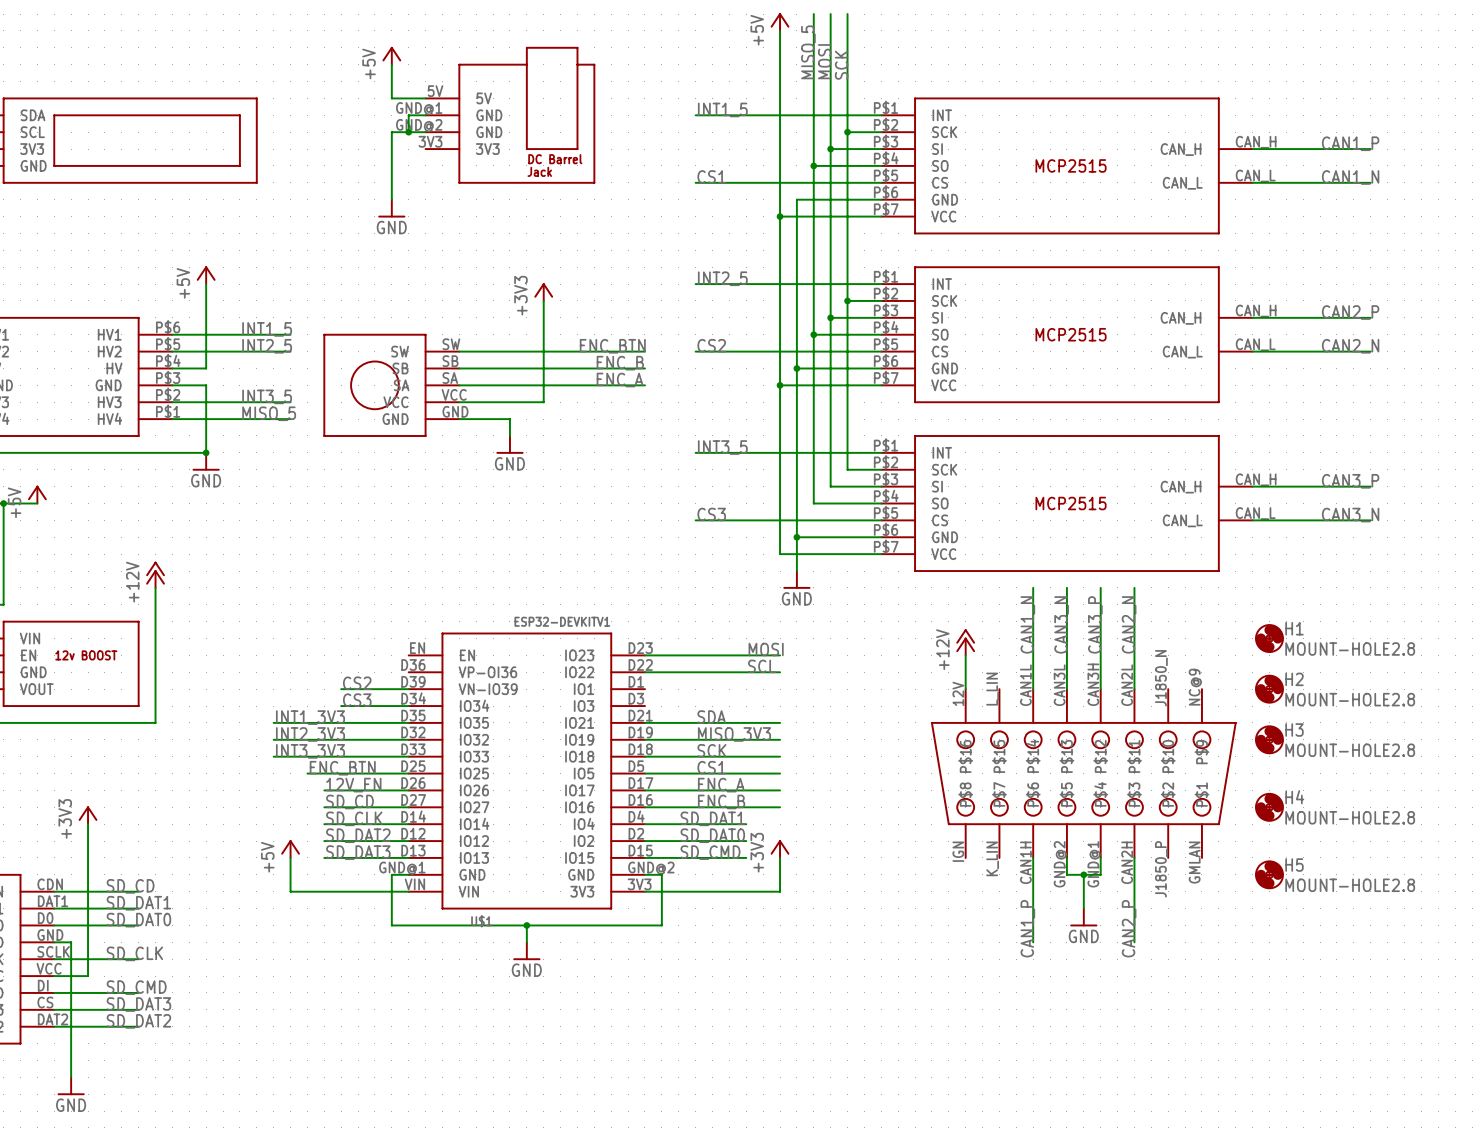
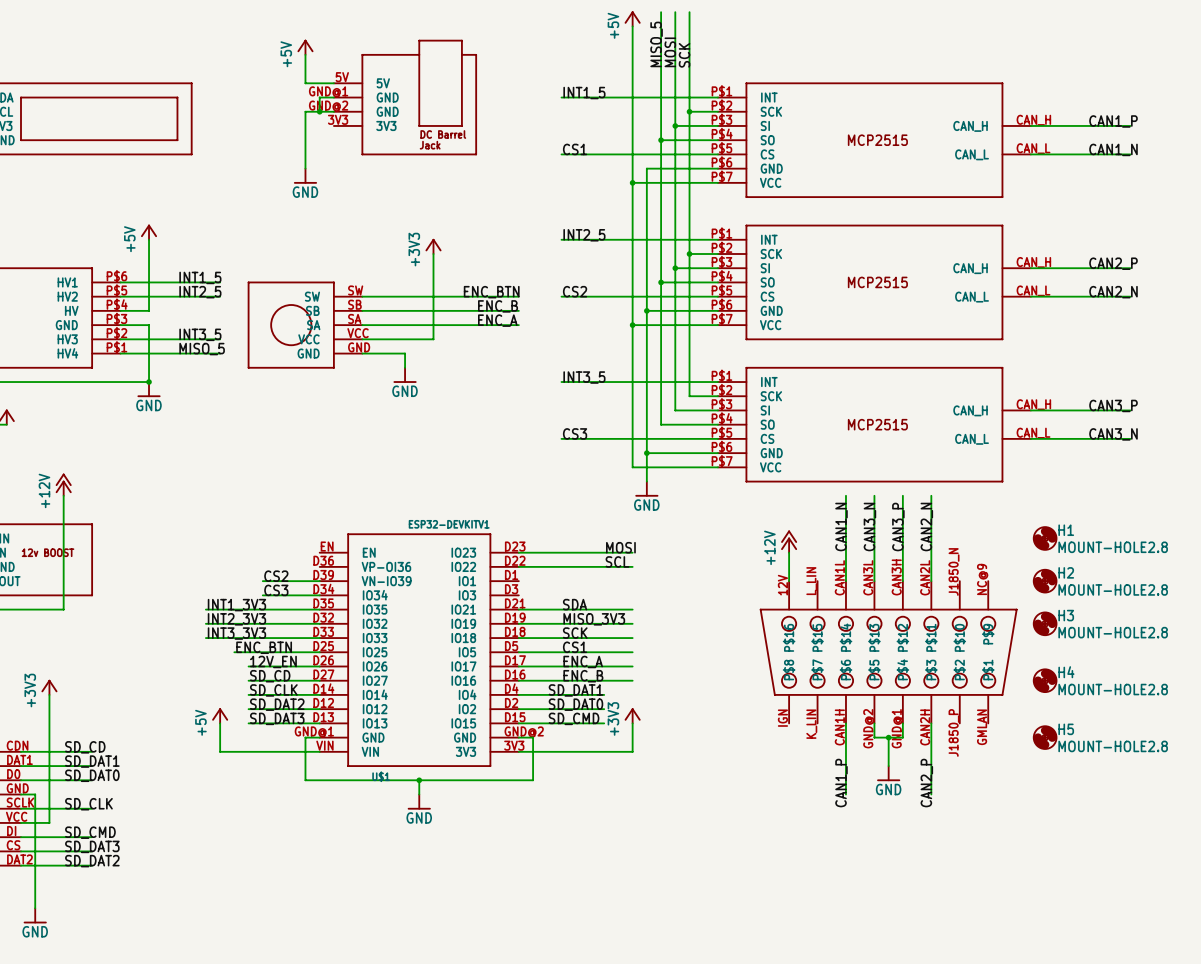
power symbol position: +12V (155, 574) -> +12V (63, 484)
wire: (155, 587) (155, 722) (104, 722) -> (63, 495) (63, 609)

